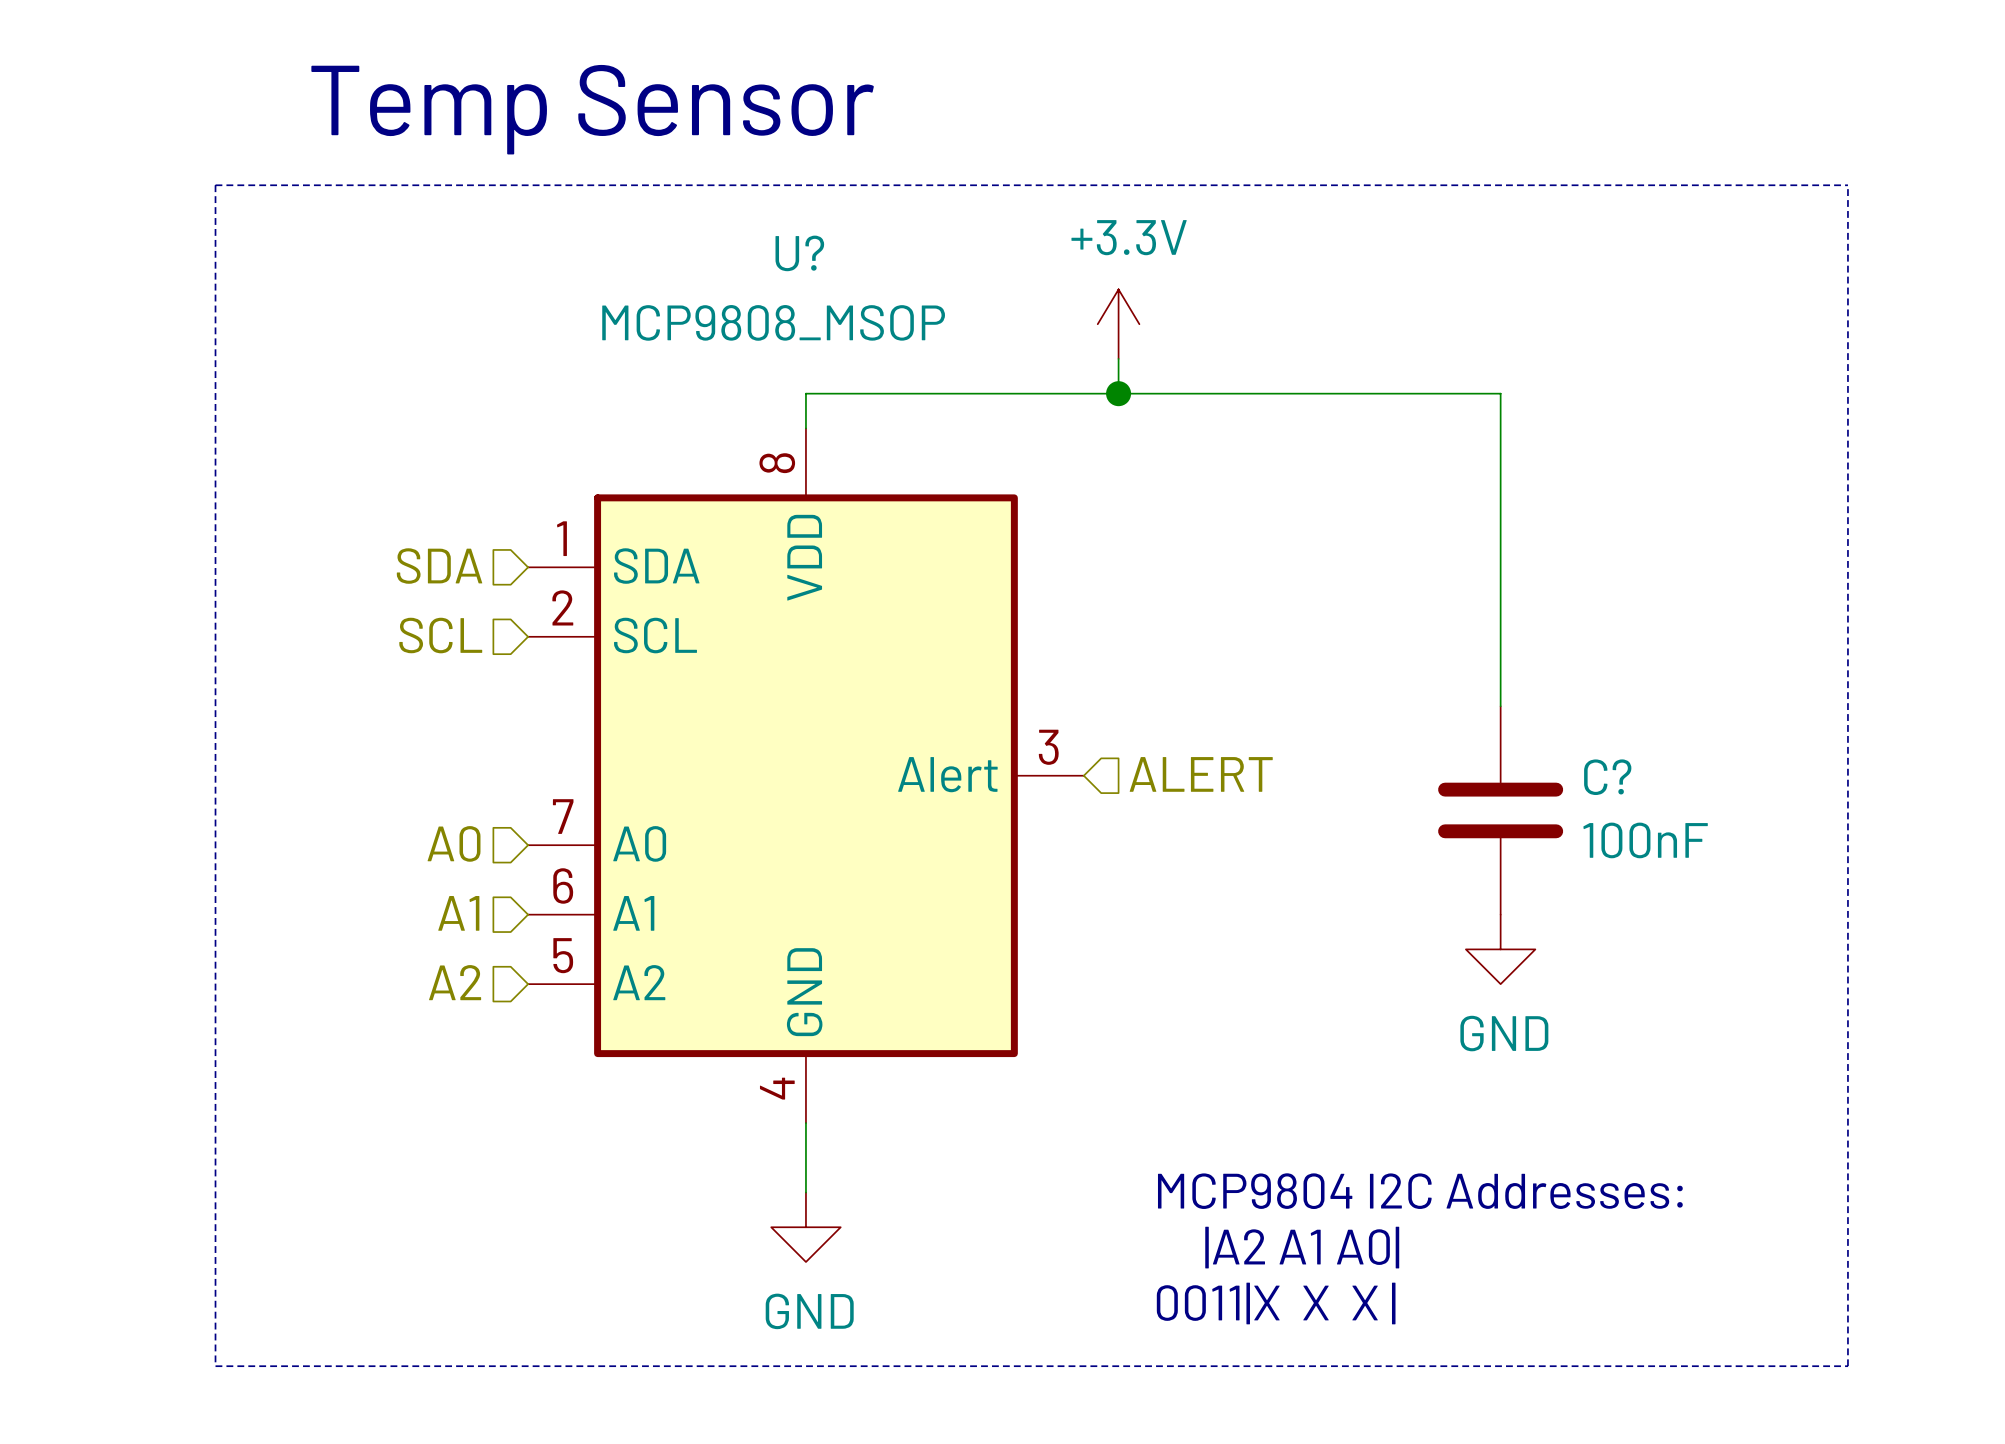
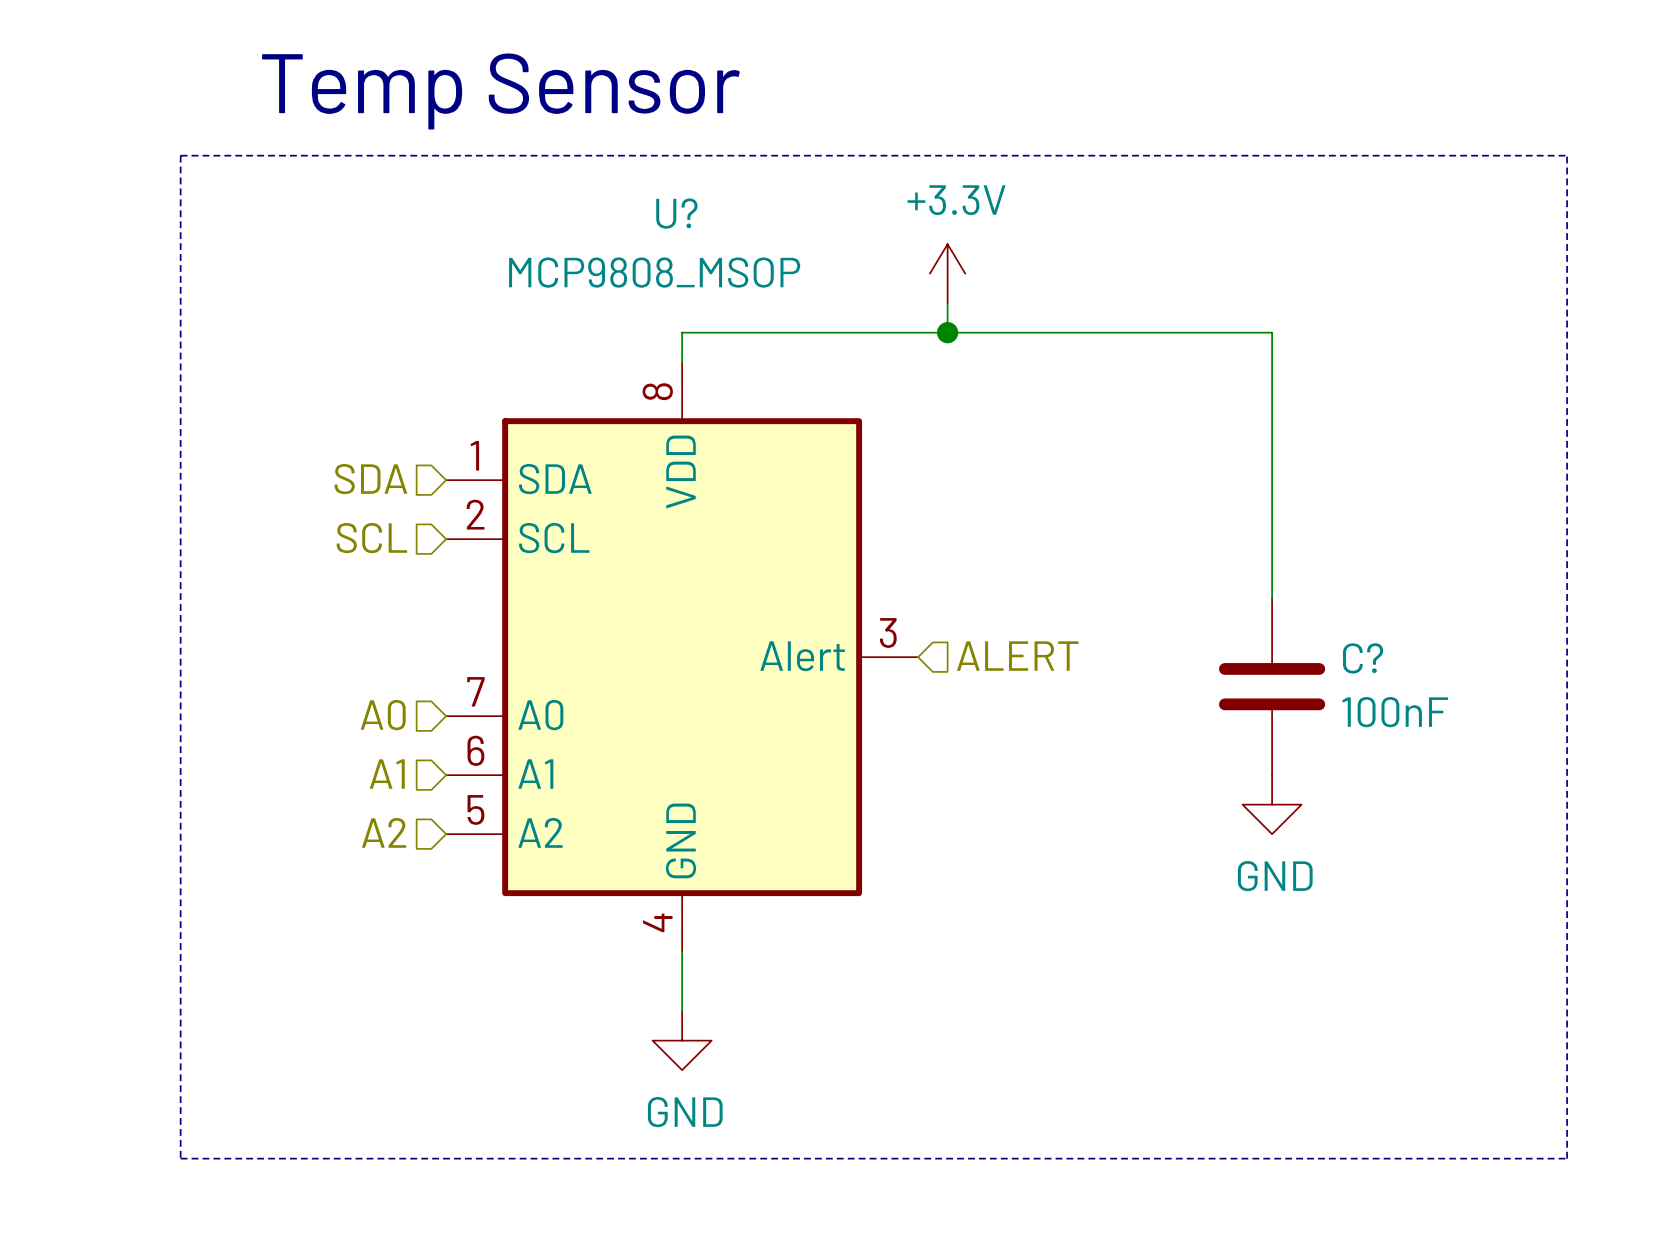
text: MCP9804 I2C Addresses: (1420, 1191) -> none
text: |A2 A1 A0| (1302, 1247) -> none
text: 0011|X X X | (1276, 1303) -> none

